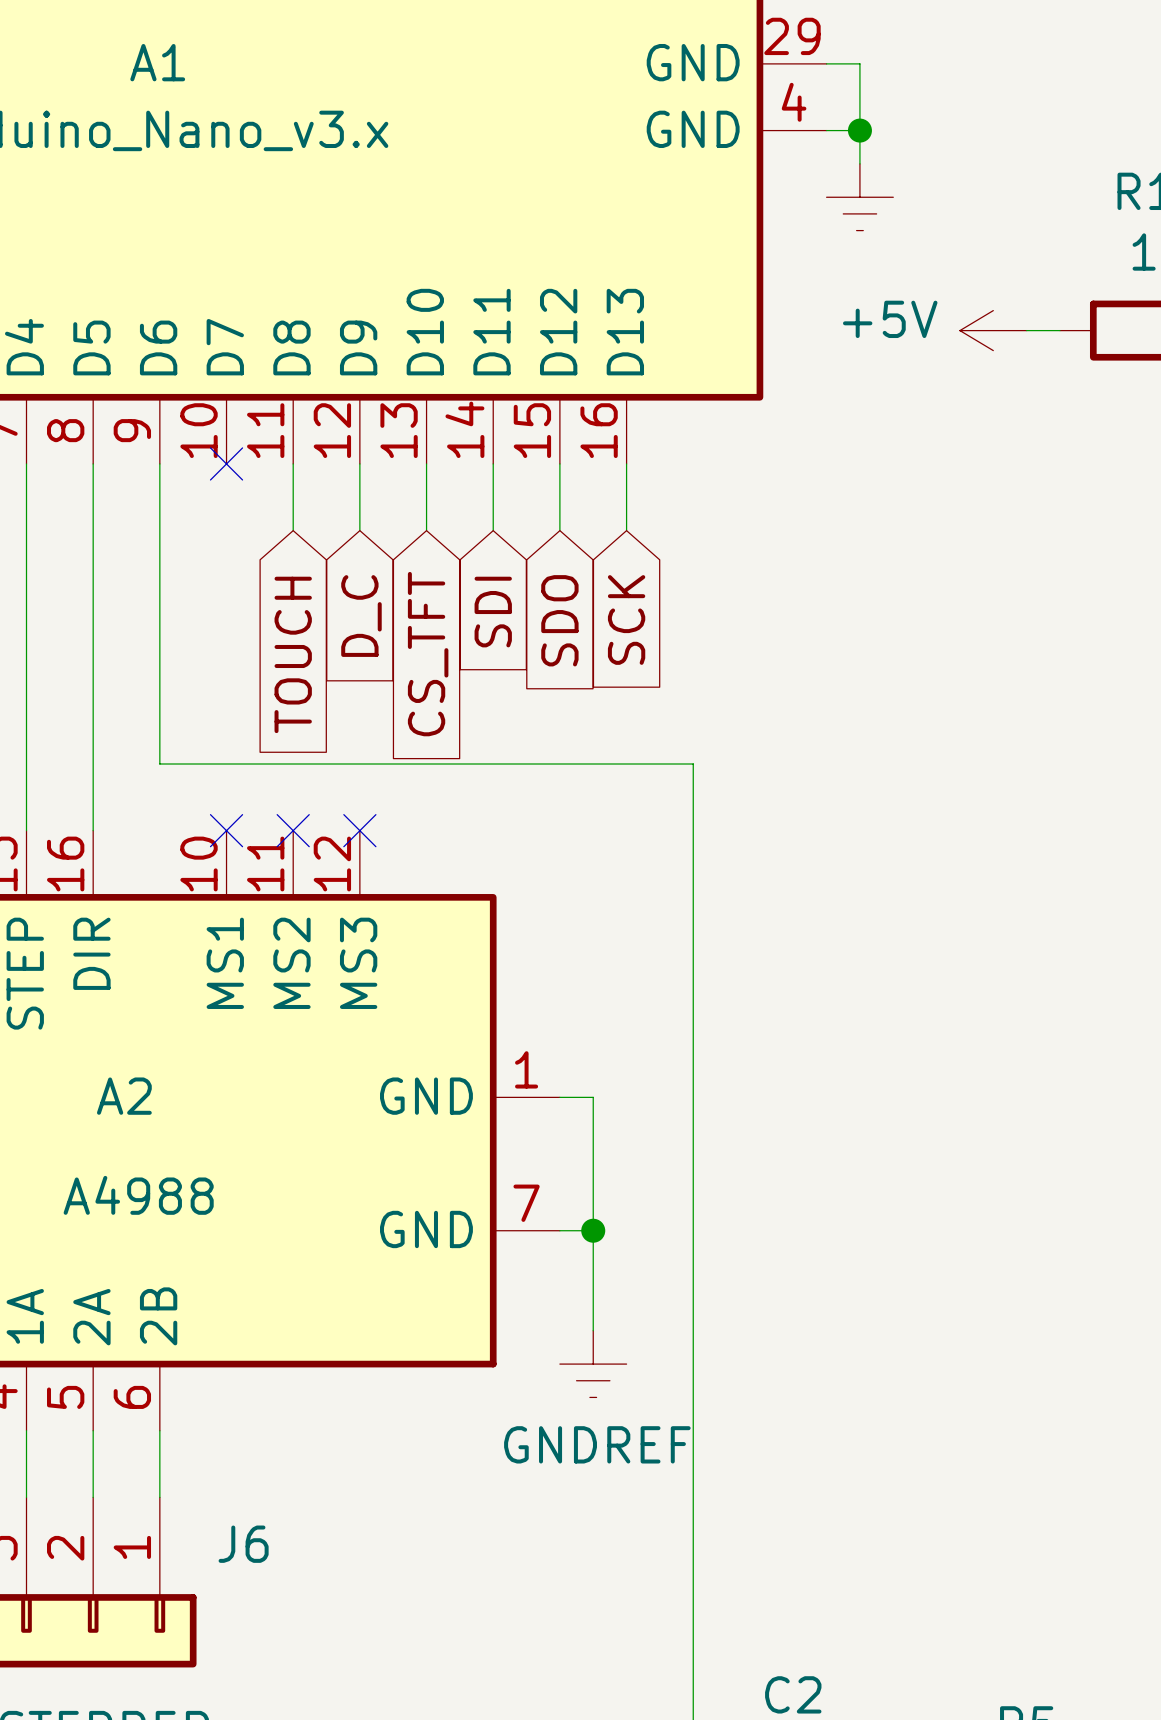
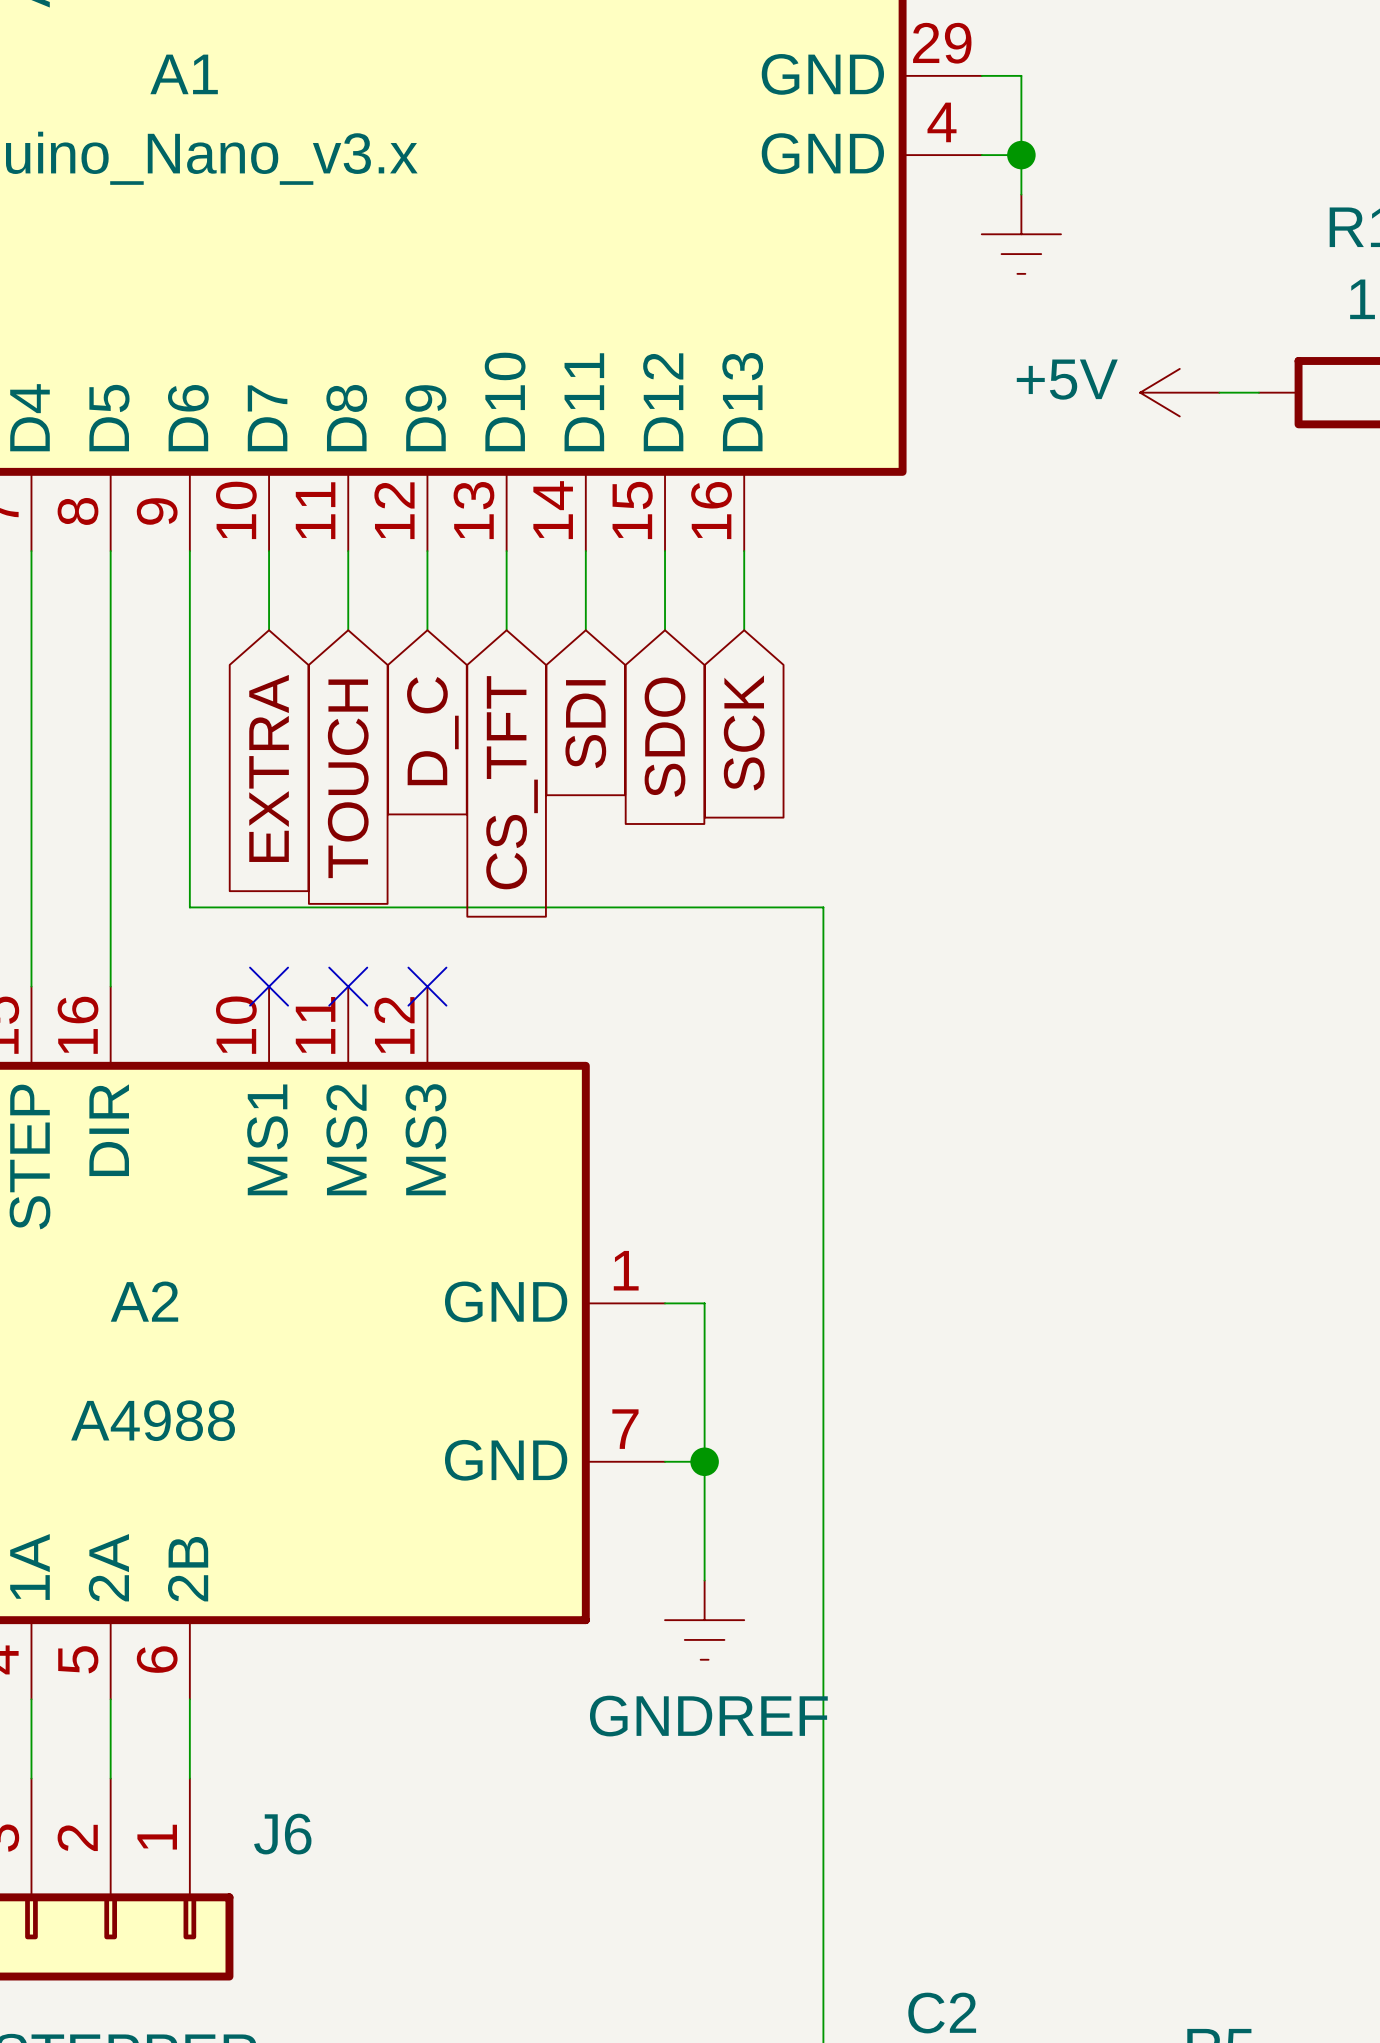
wire: none -> (269, 551) (269, 630)
no-connect mark: (226, 463) -> none
global label: none -> EXTRA (269, 768)

